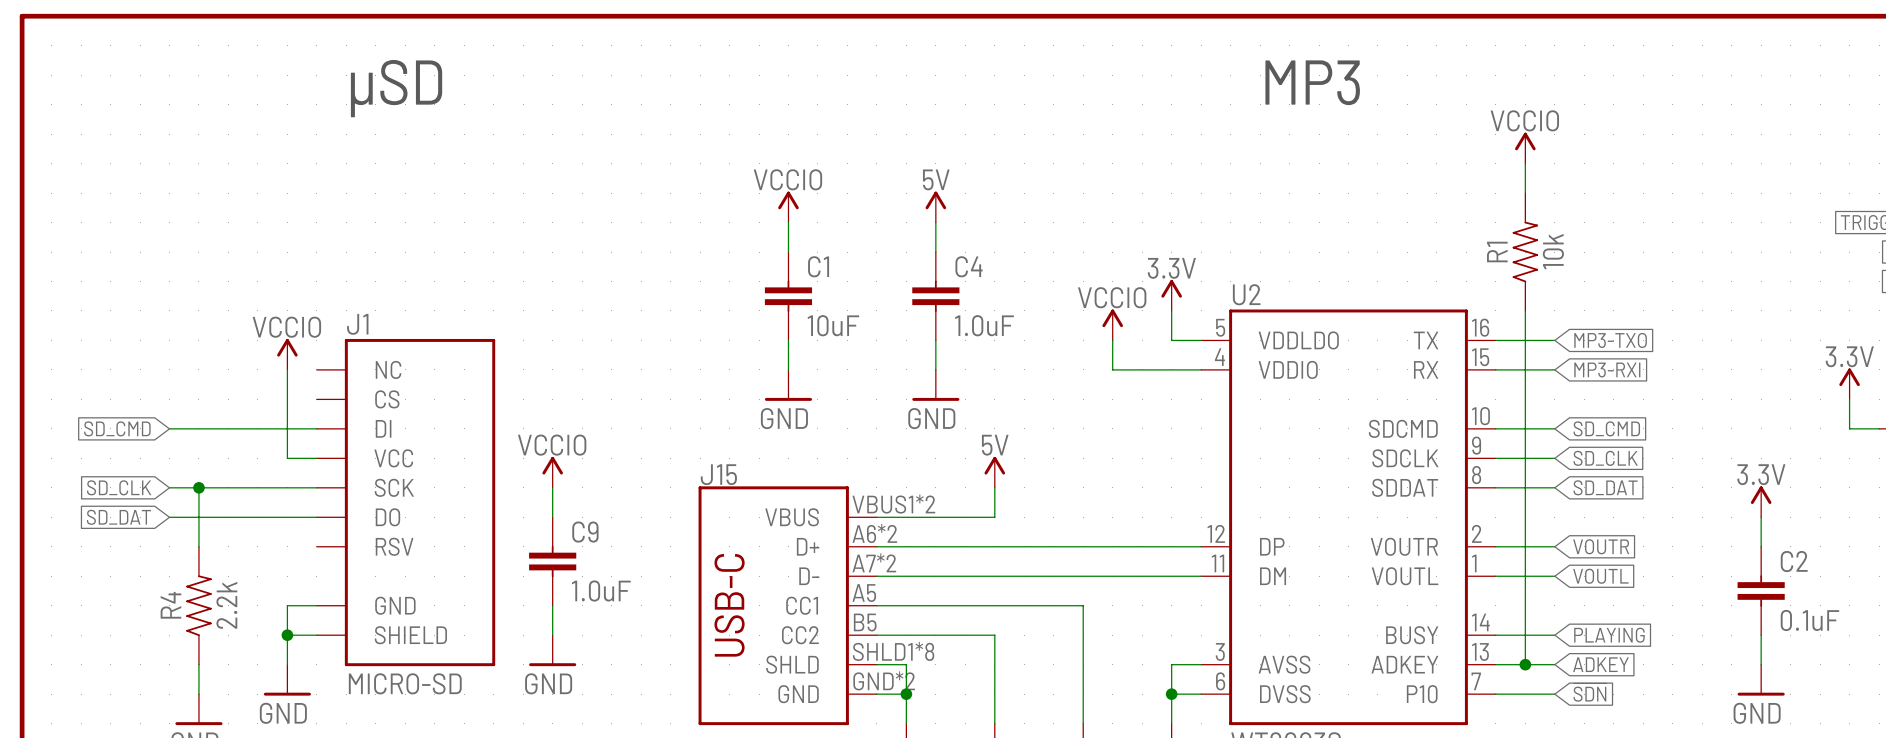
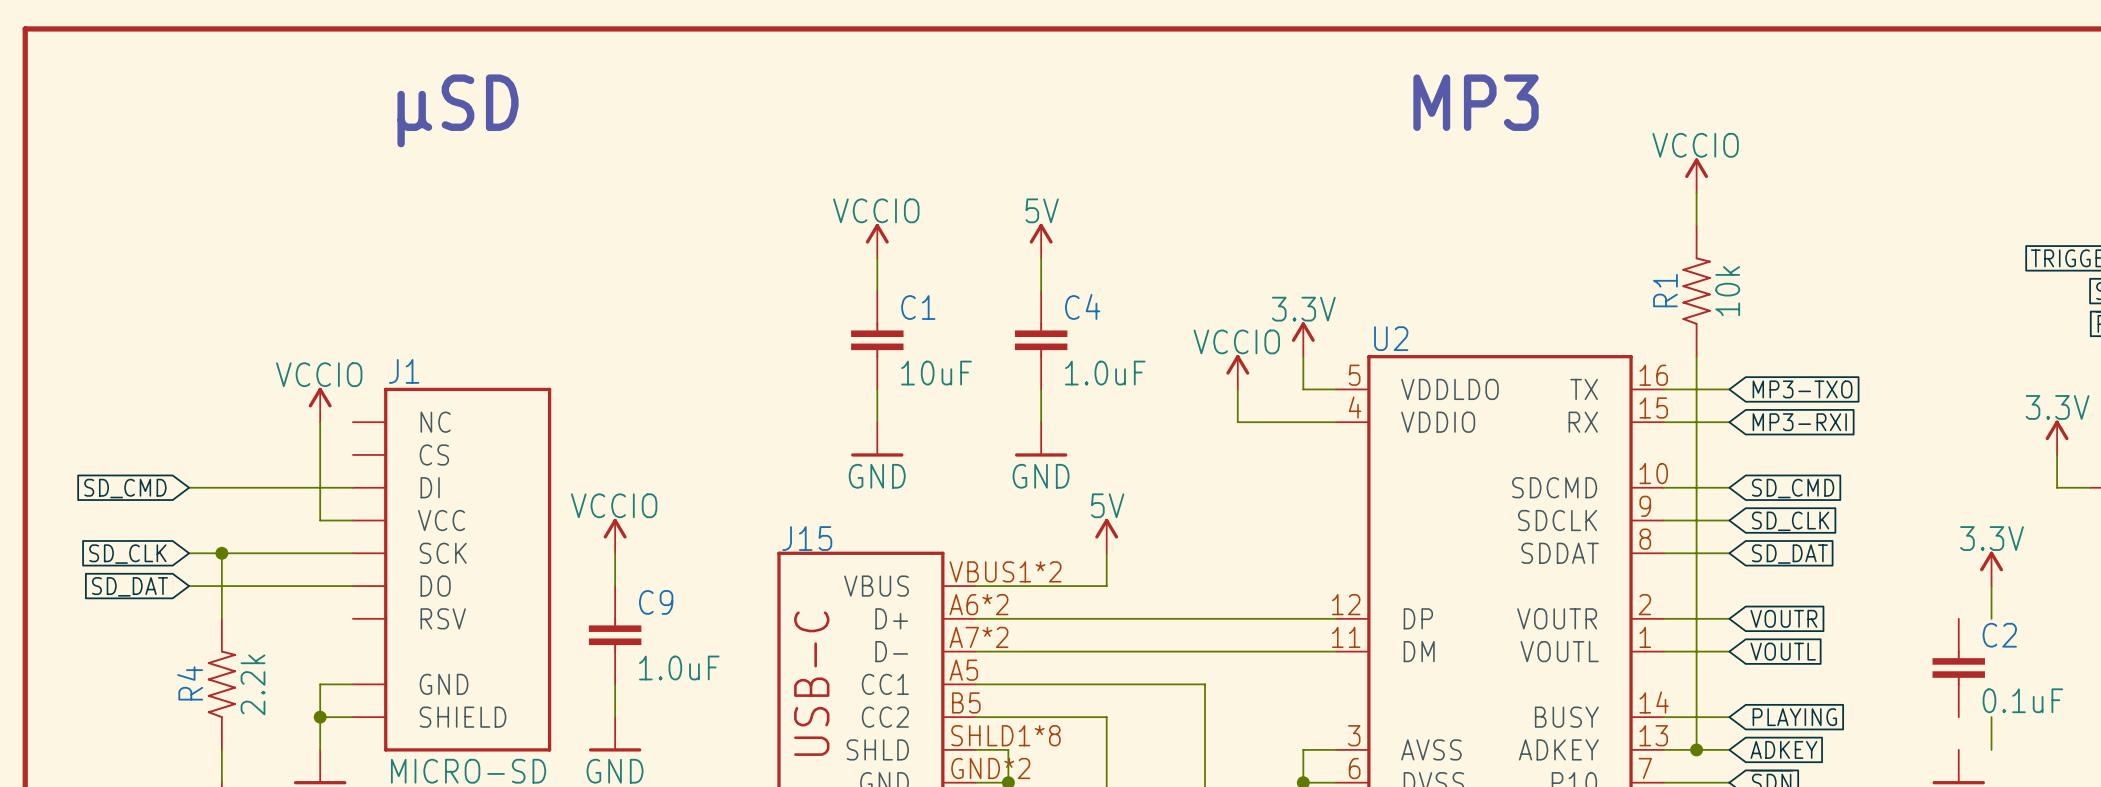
power symbol position: 3.3V (1761, 501) -> 3.3V (1991, 568)
wire: (1761, 517) (1761, 546) -> (1991, 586) (1991, 618)
wire: (1761, 635) (1761, 664) -> (1991, 717) (1991, 749)

